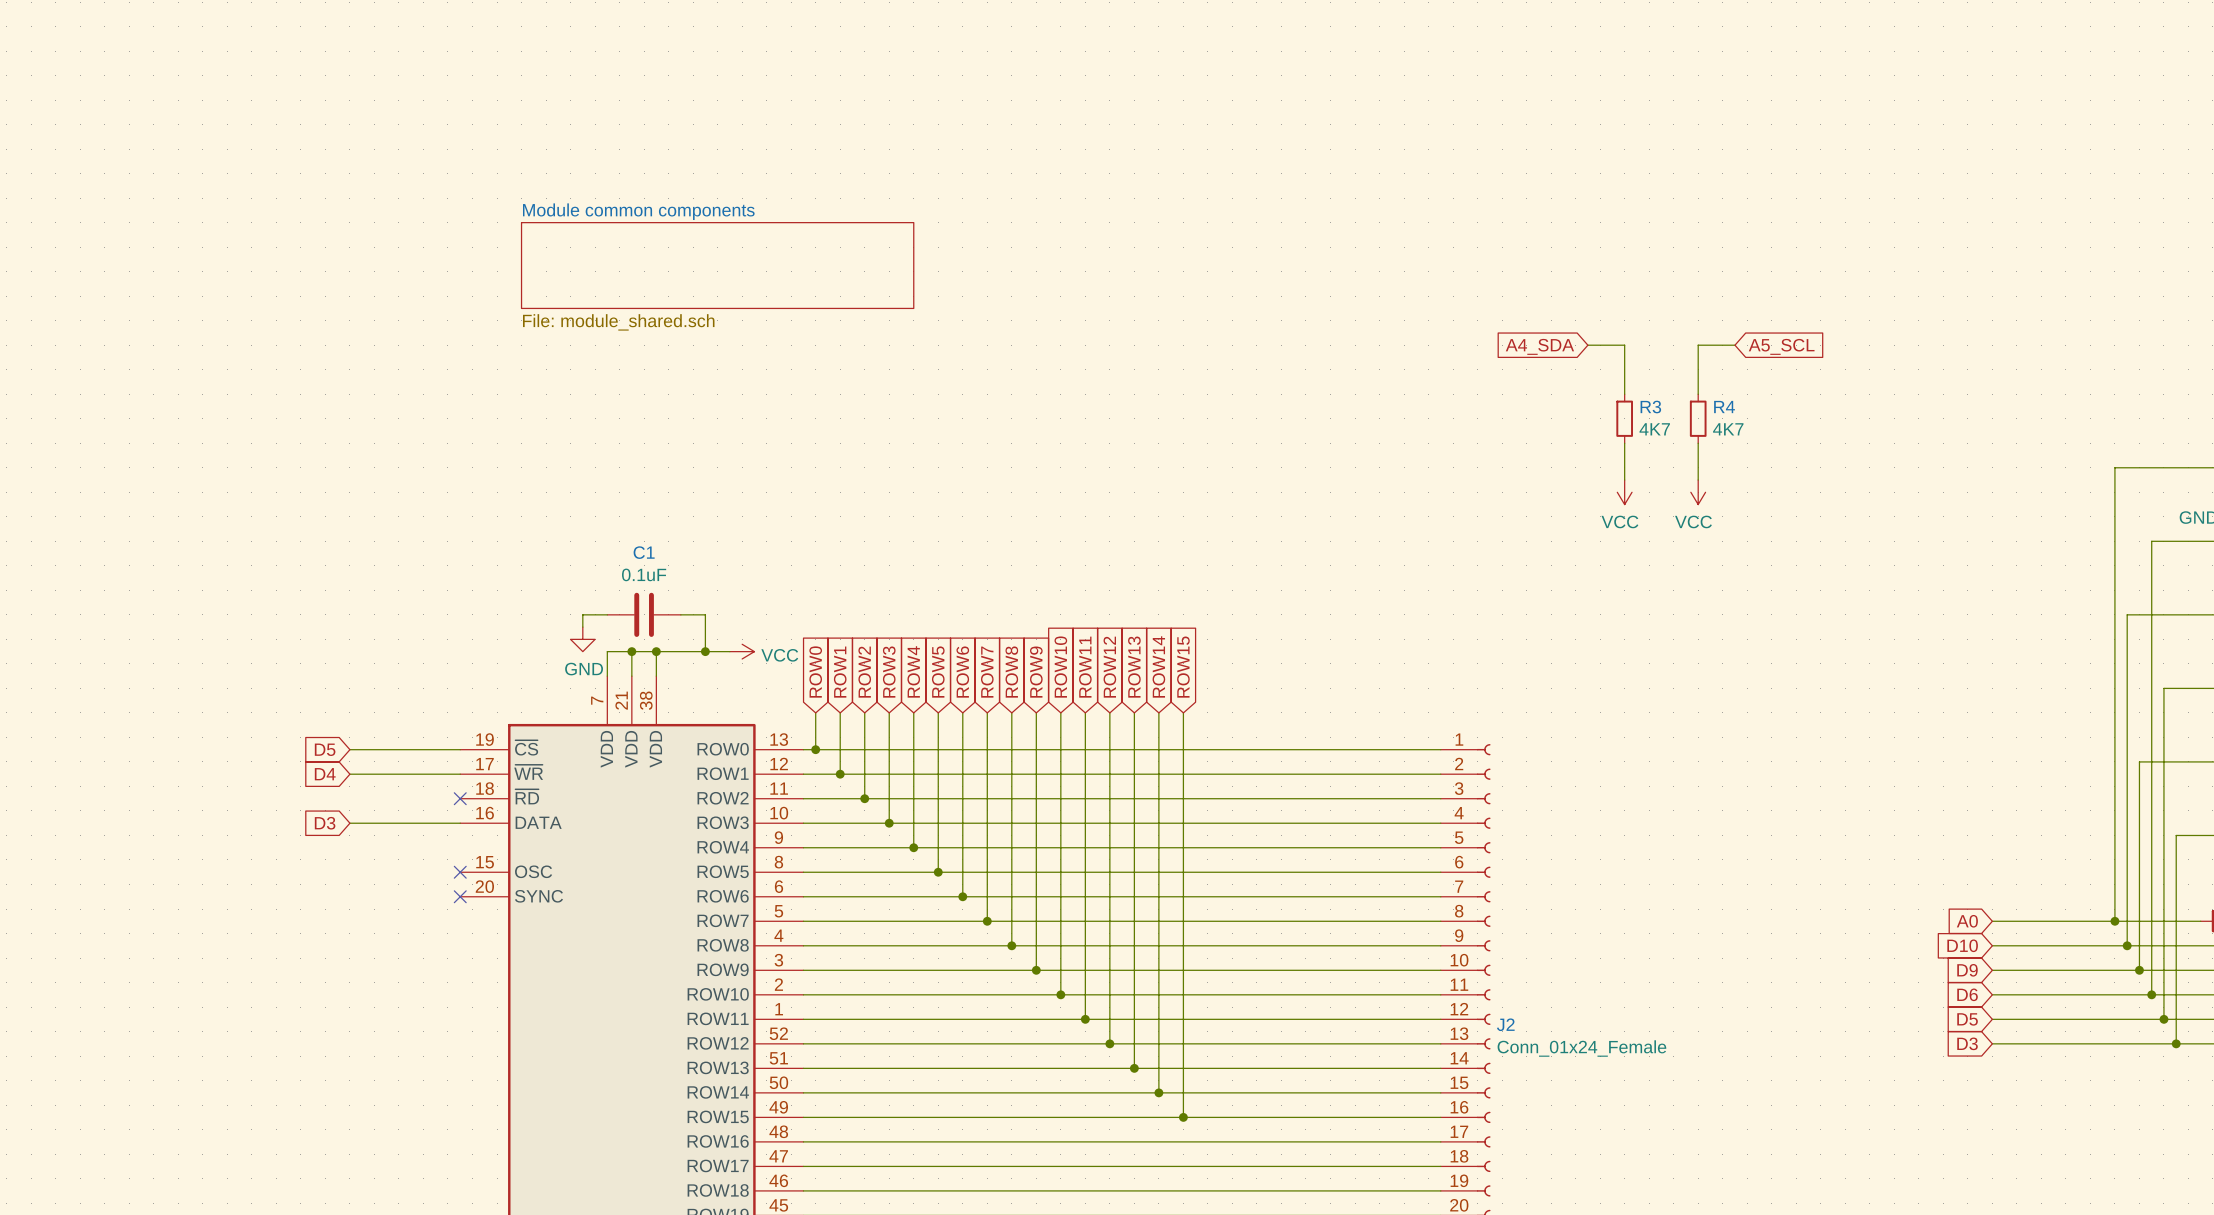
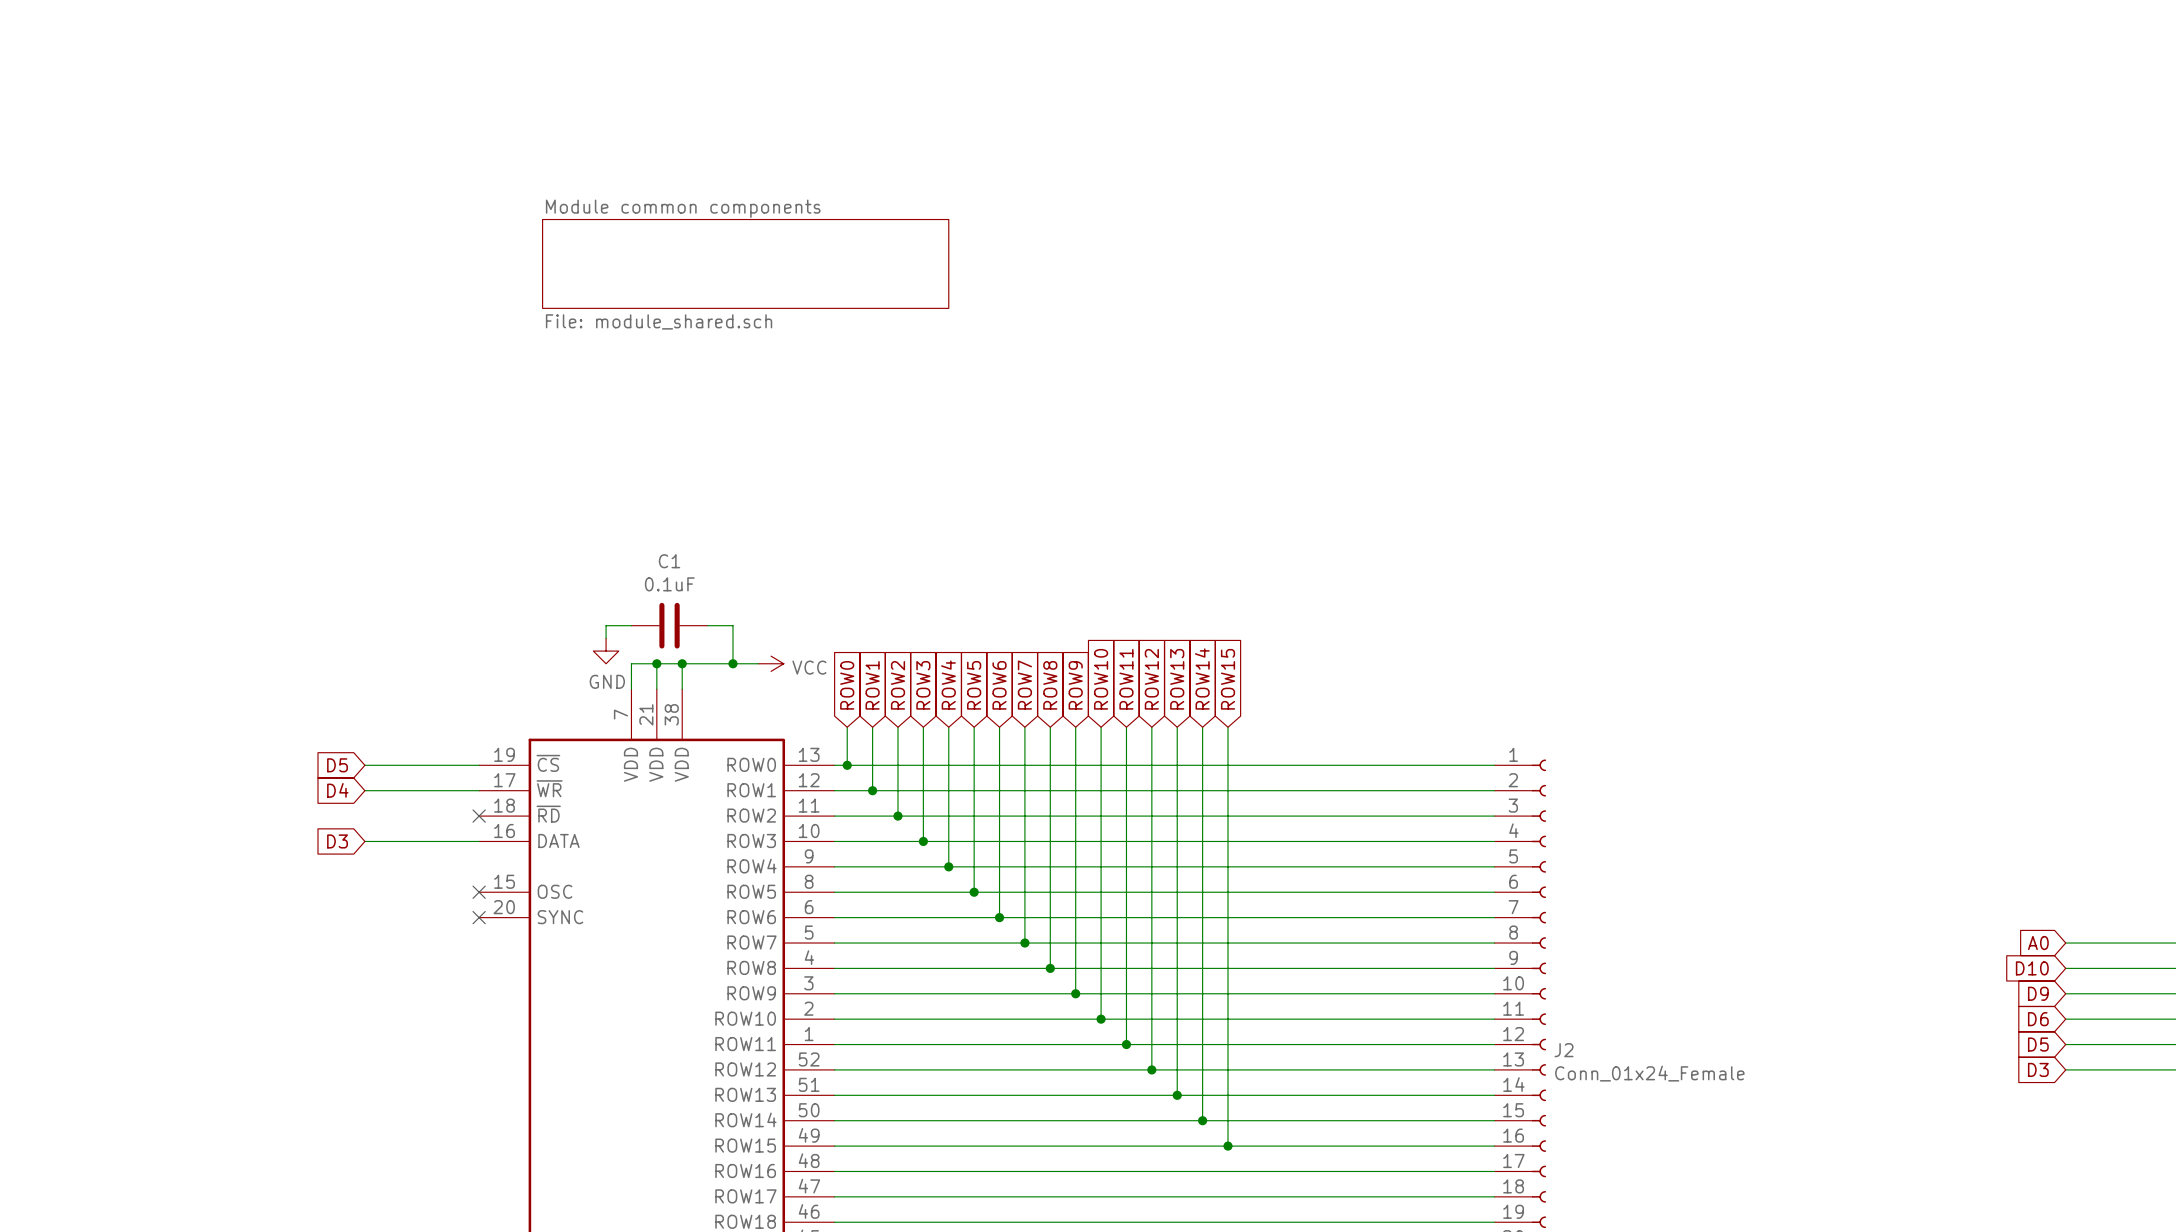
wire: (1587, 345) (1624, 345) (1624, 394) -> none
wire: (1734, 345) (1698, 345) (1698, 394) -> none
global label: A4_SDA (1539, 346) -> none
global label: A5_SCL (1781, 346) -> none
R3: 4K7 (1624, 418) -> none
R4: 4K7 (1698, 418) -> none
wire: (1624, 443) (1624, 480) -> none
wire: (1698, 443) (1698, 480) -> none
power symbol: VCC (1624, 492) -> none
power symbol: VCC (1698, 492) -> none

